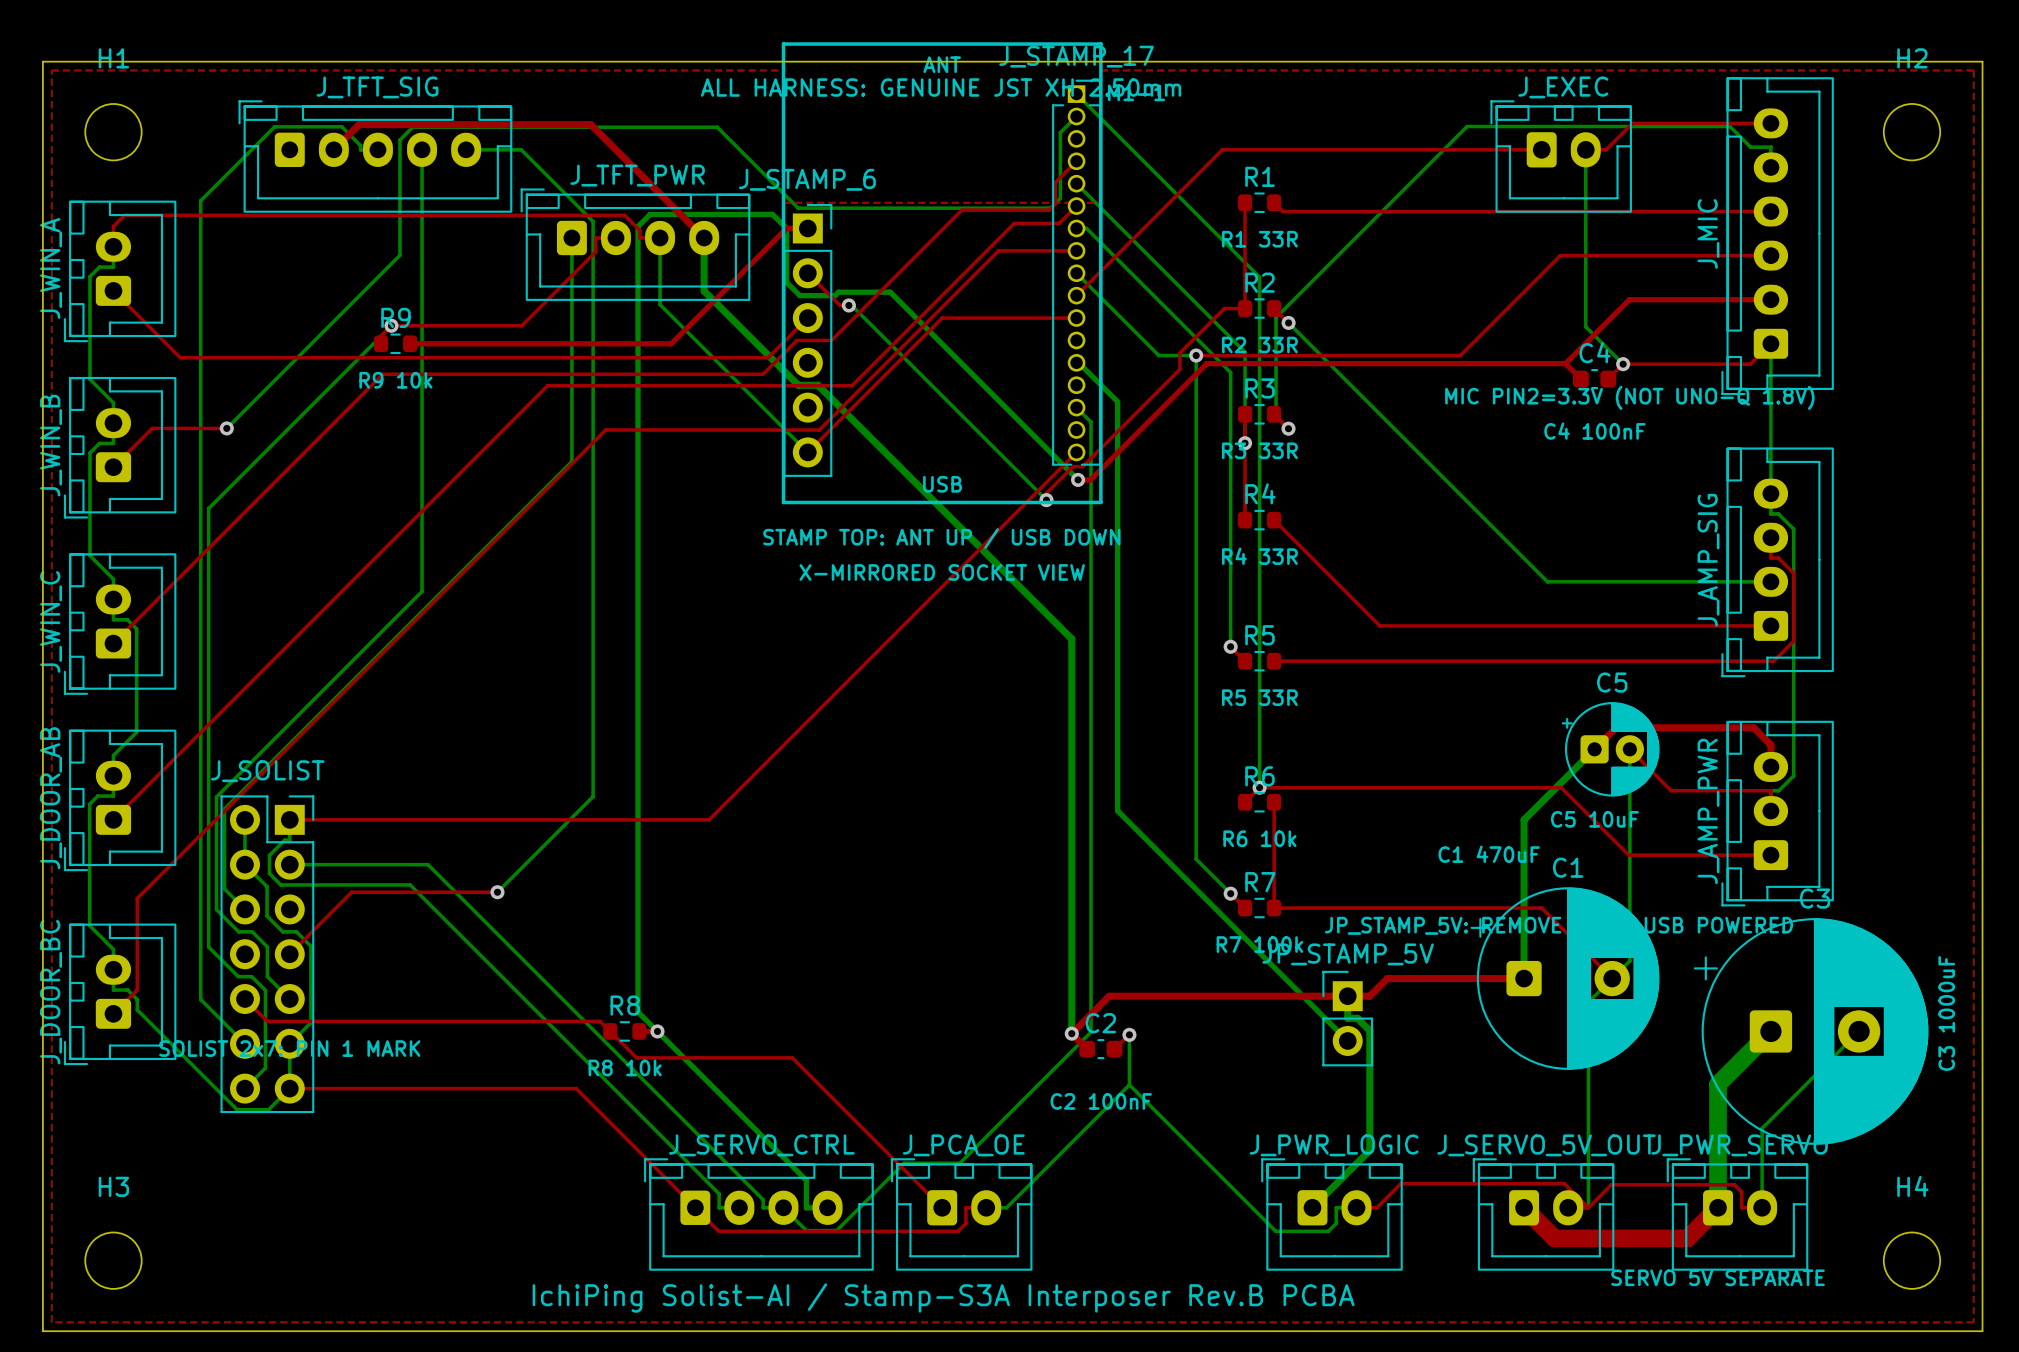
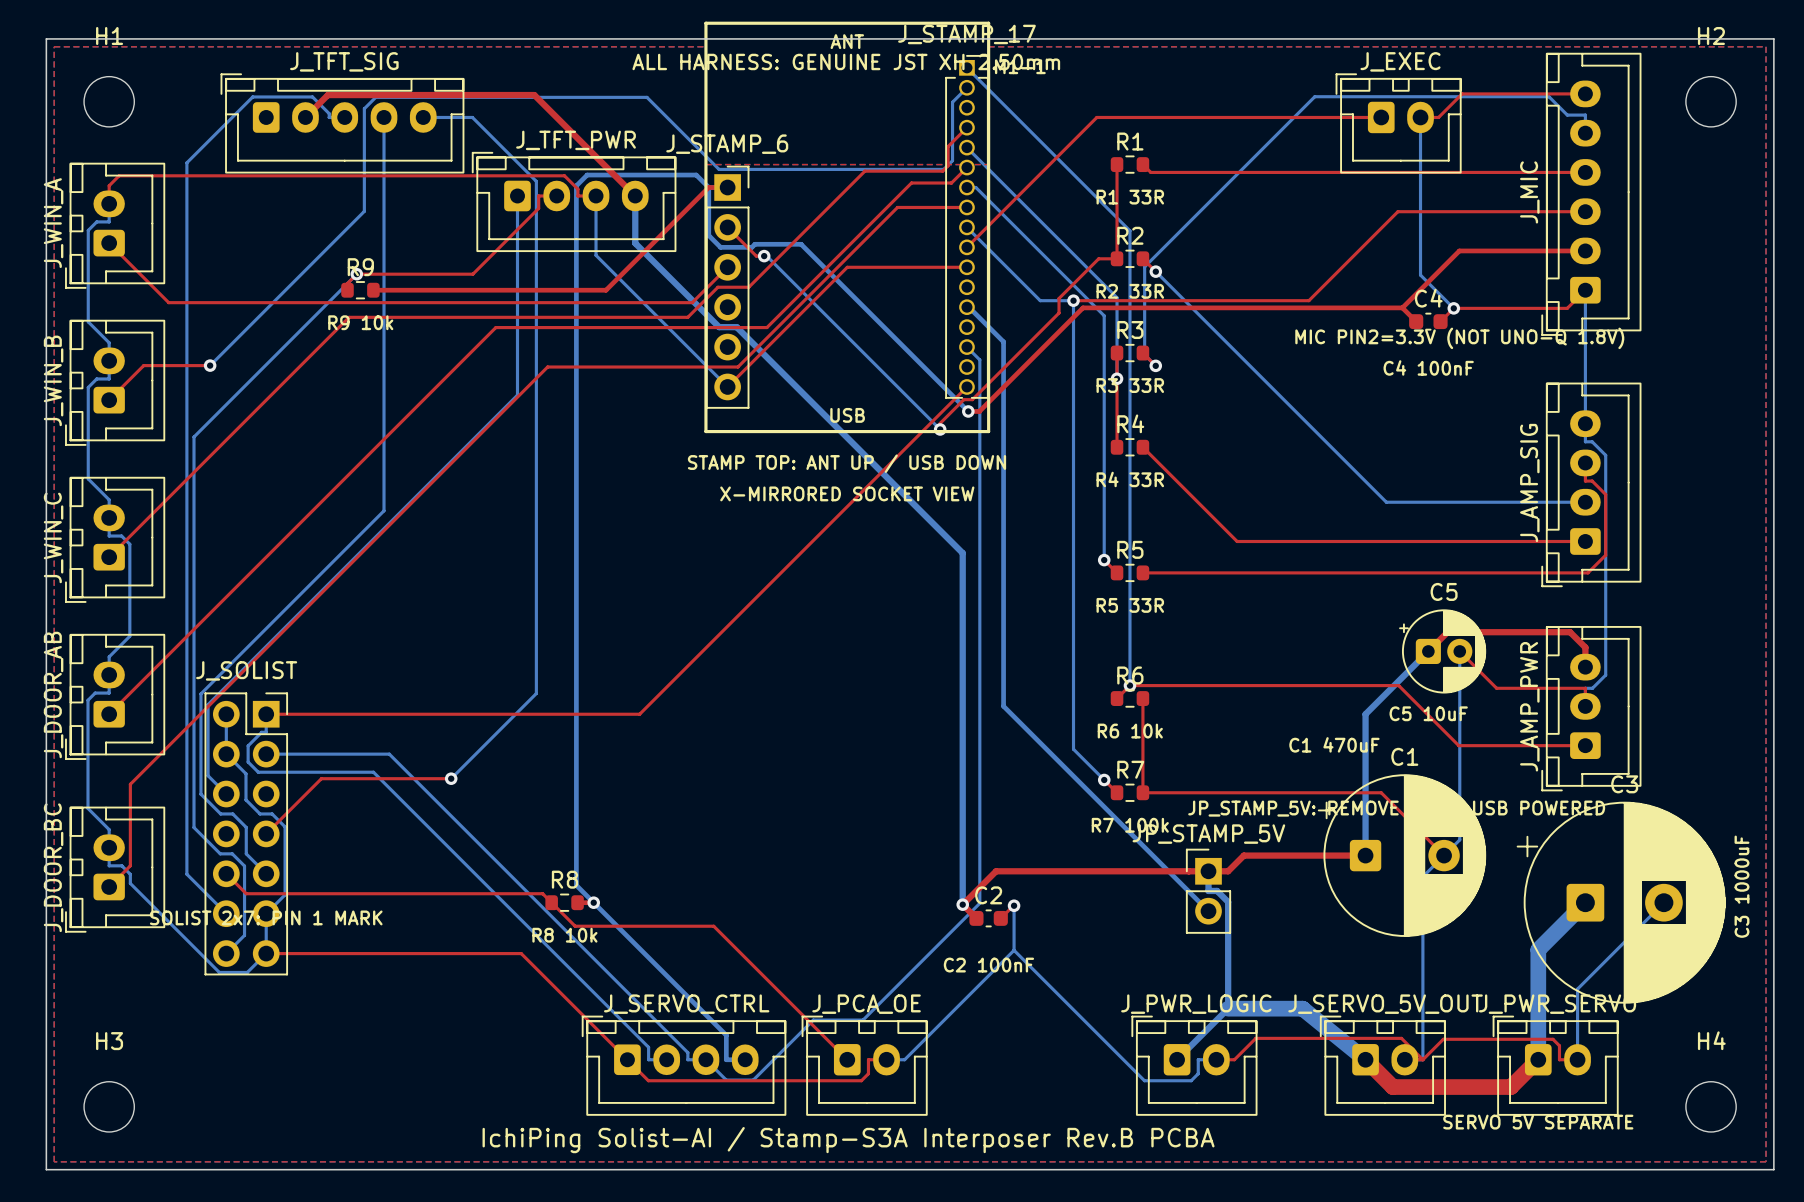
bottom track: none -> (1228, 1008) (1302, 1008) (1365, 1059)

